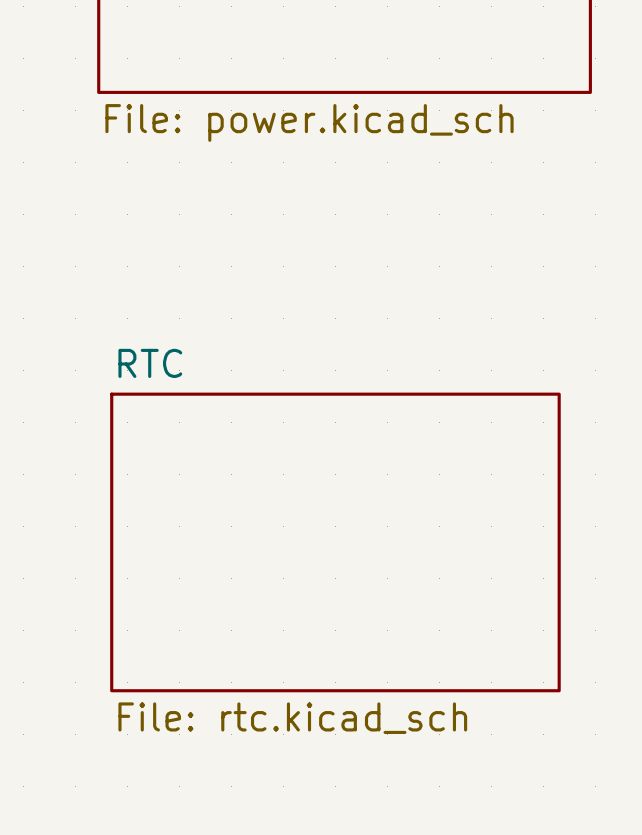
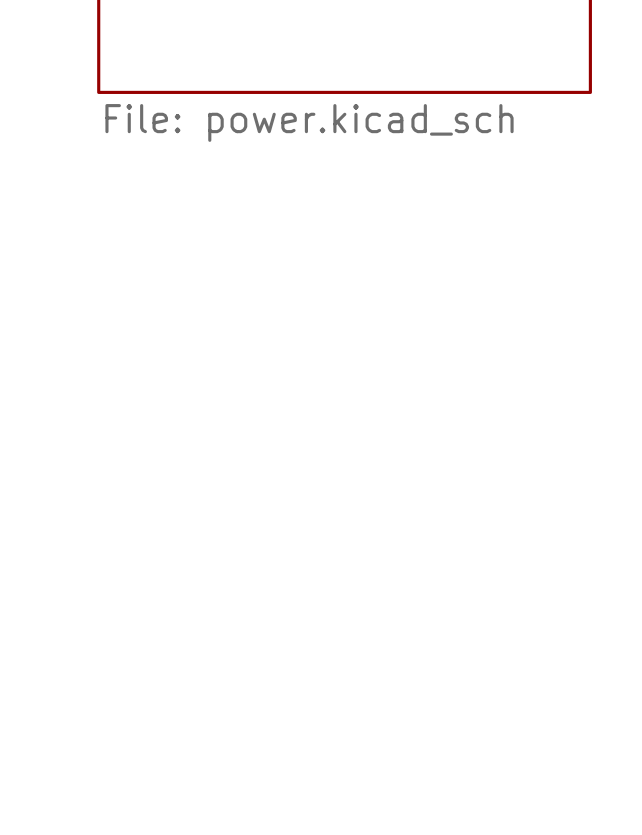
sheet RTC: File: rtc.kicad_sch (335, 542) -> none

